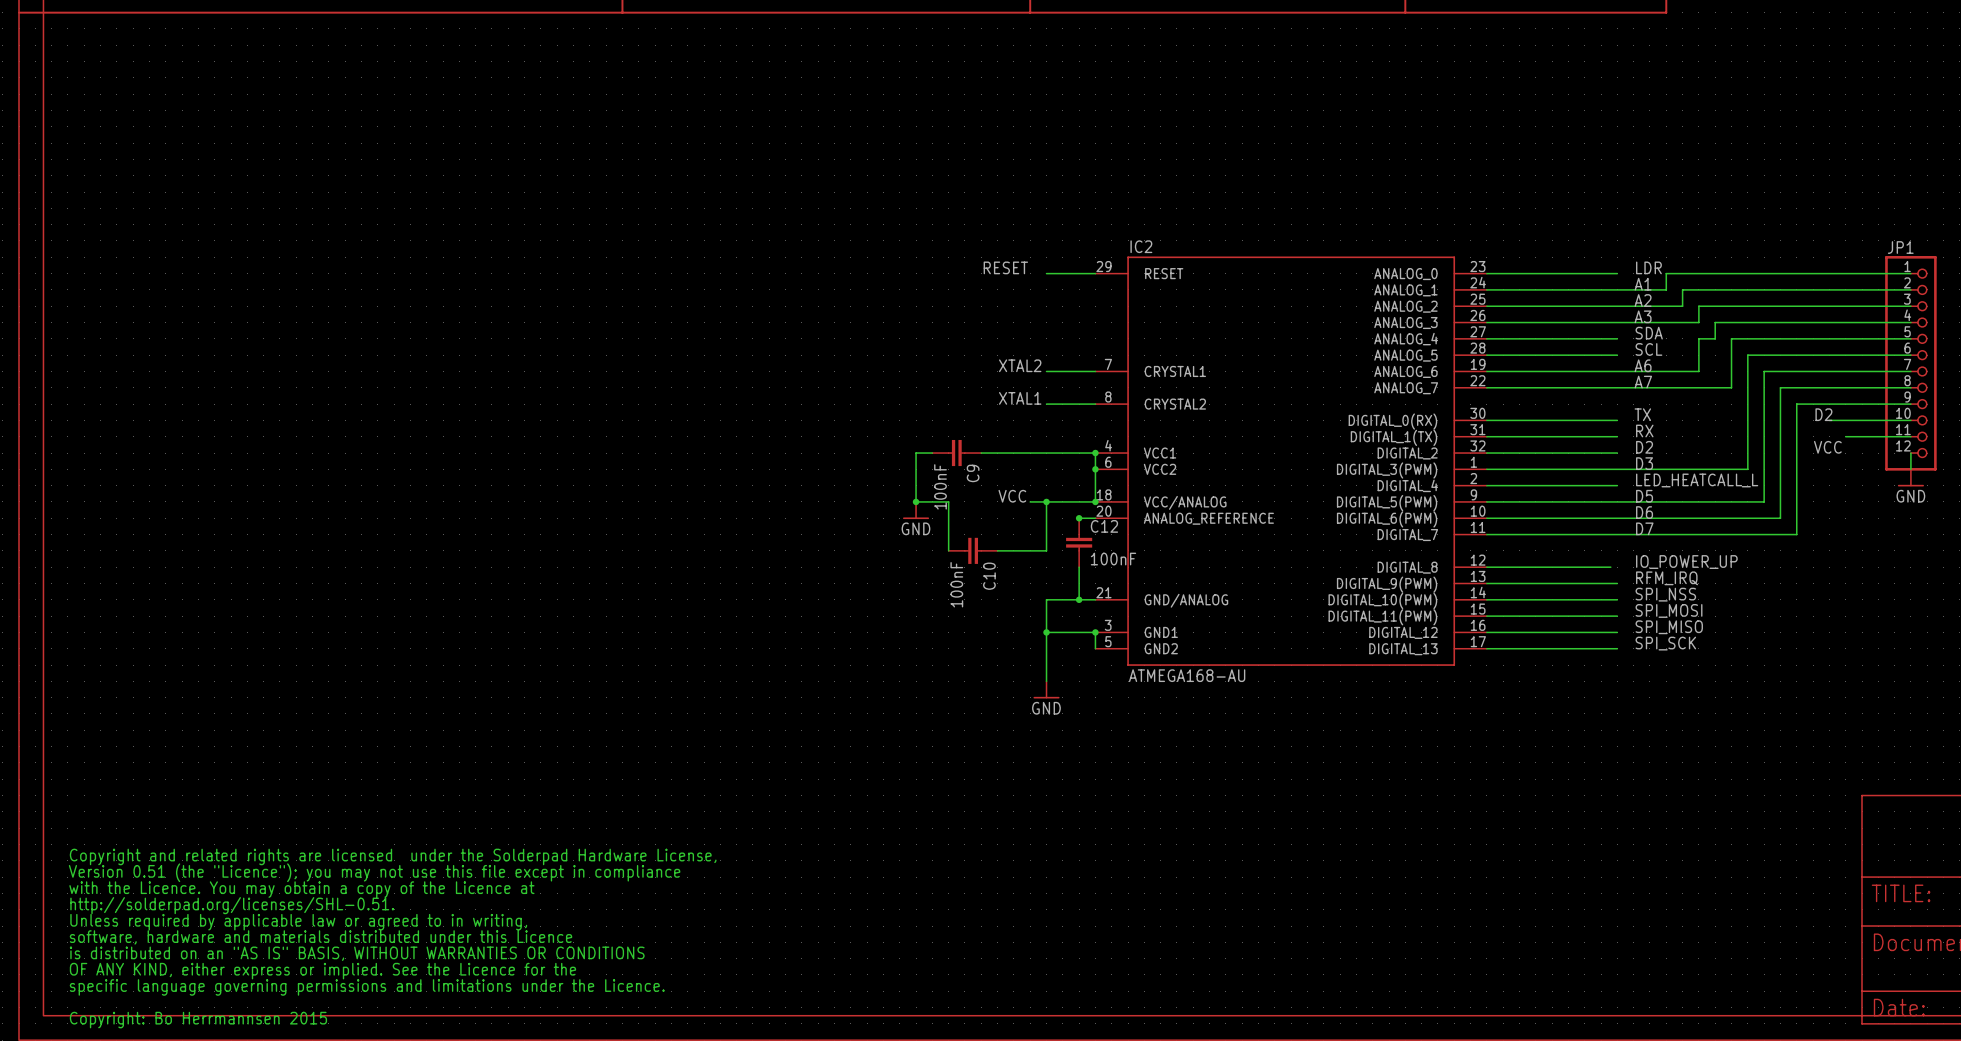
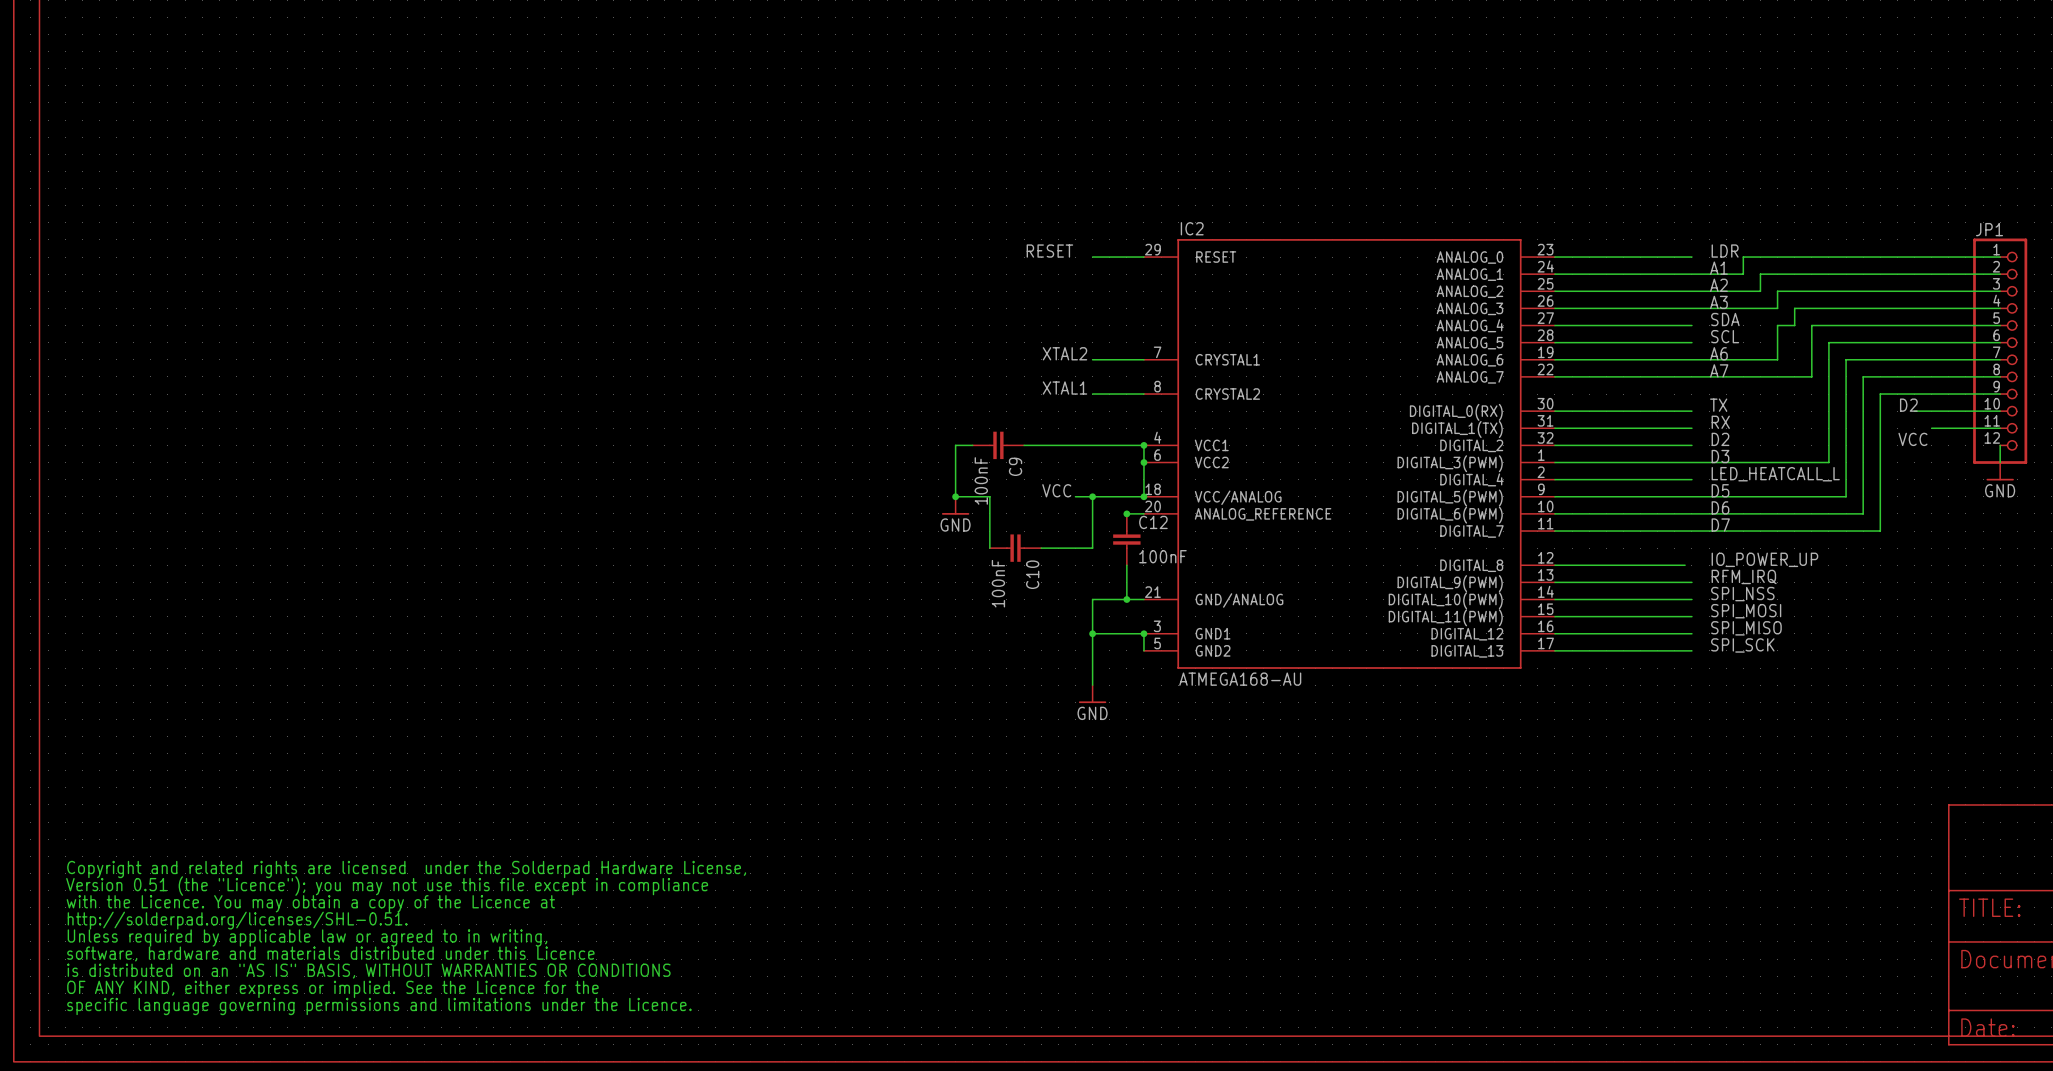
text: Copyright: Bo Herrmannsen 2015 (198, 1020) -> none

